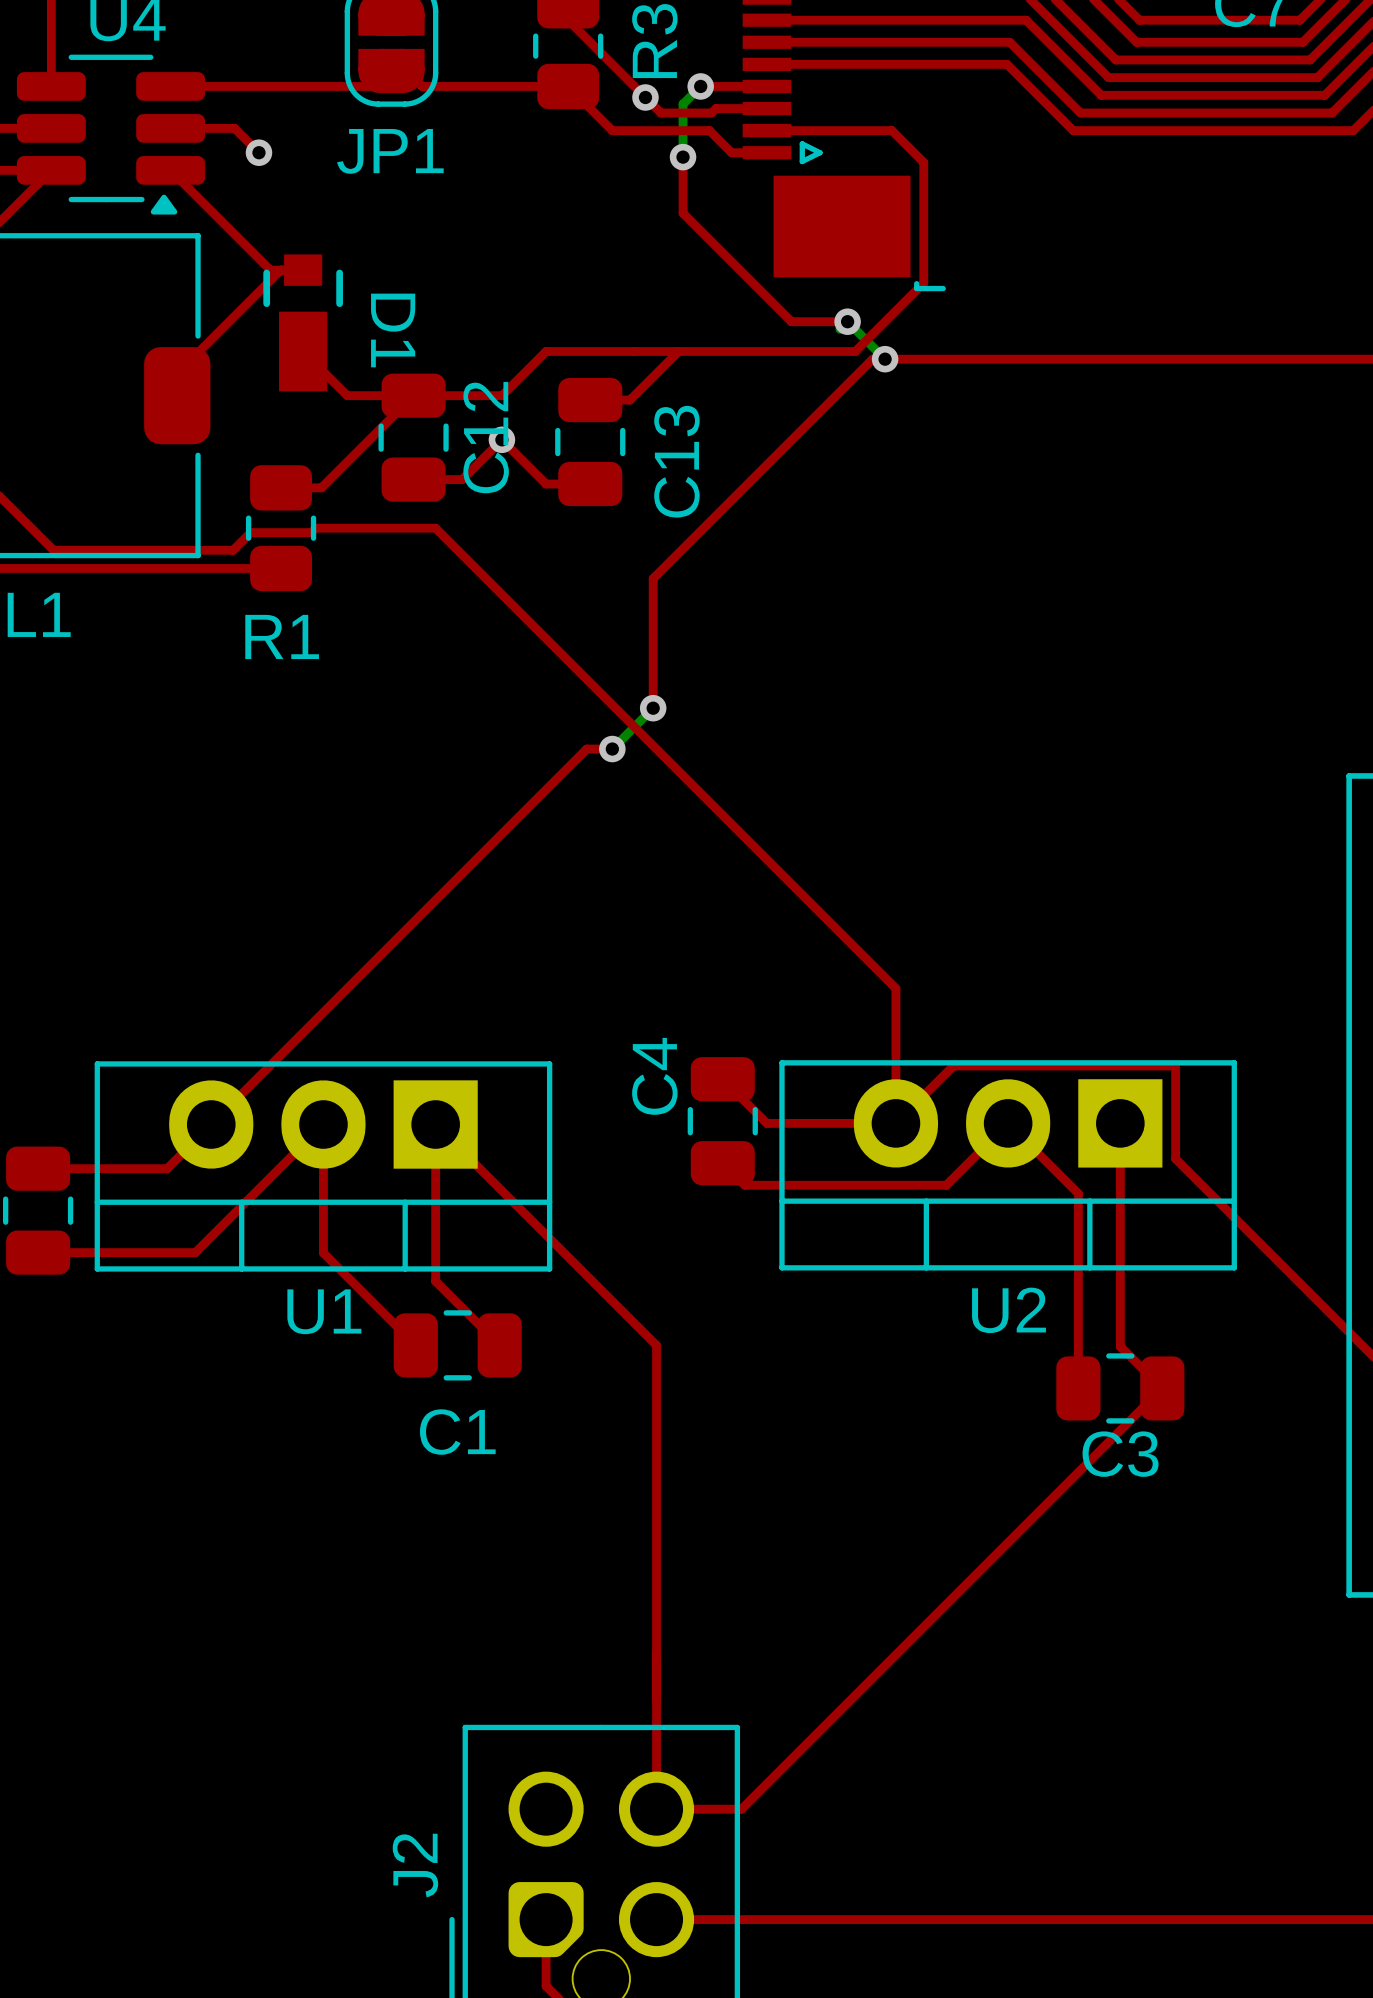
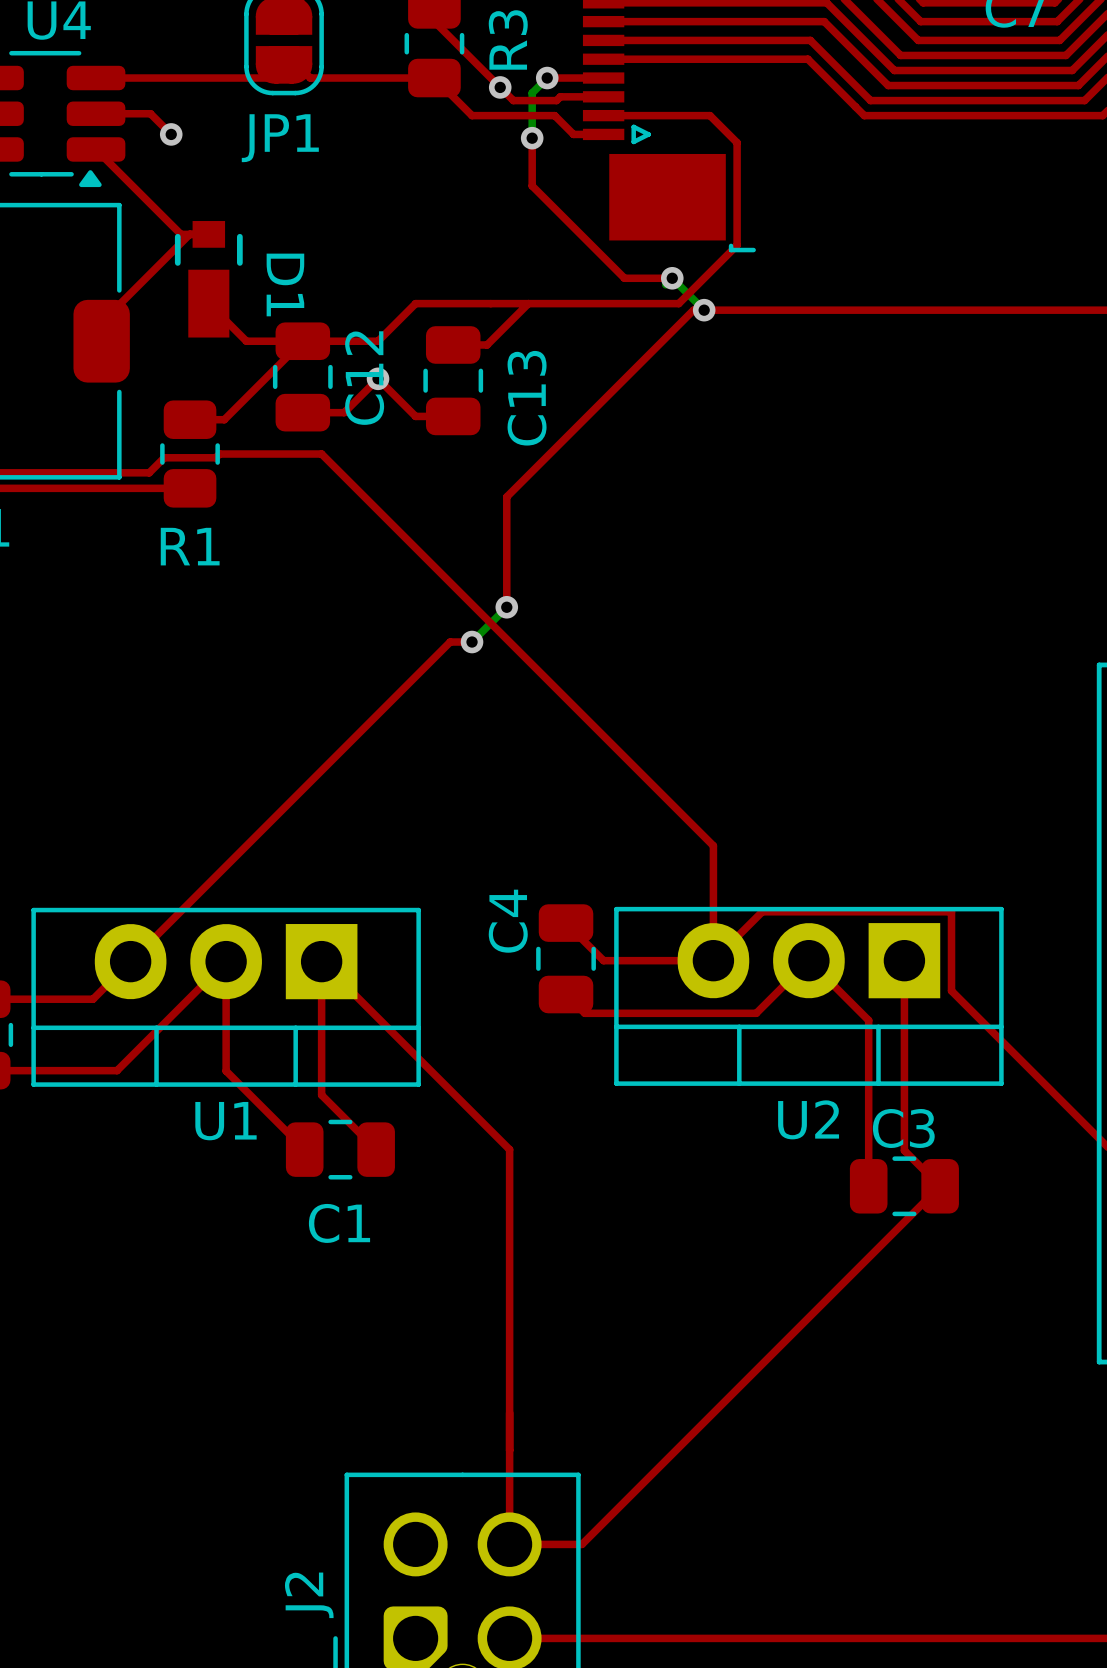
C3 name position: C3 (1120, 1454) -> C3 (903, 1128)

